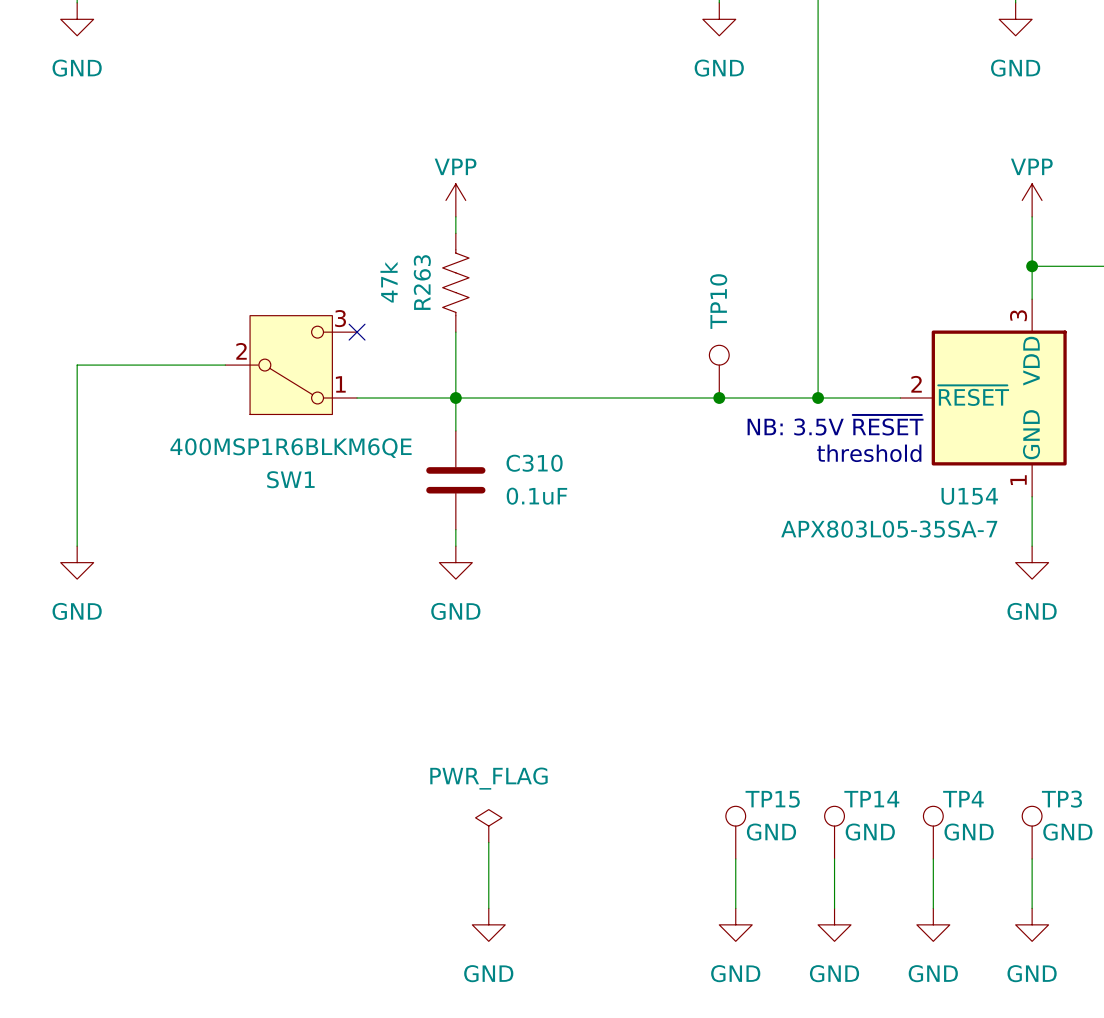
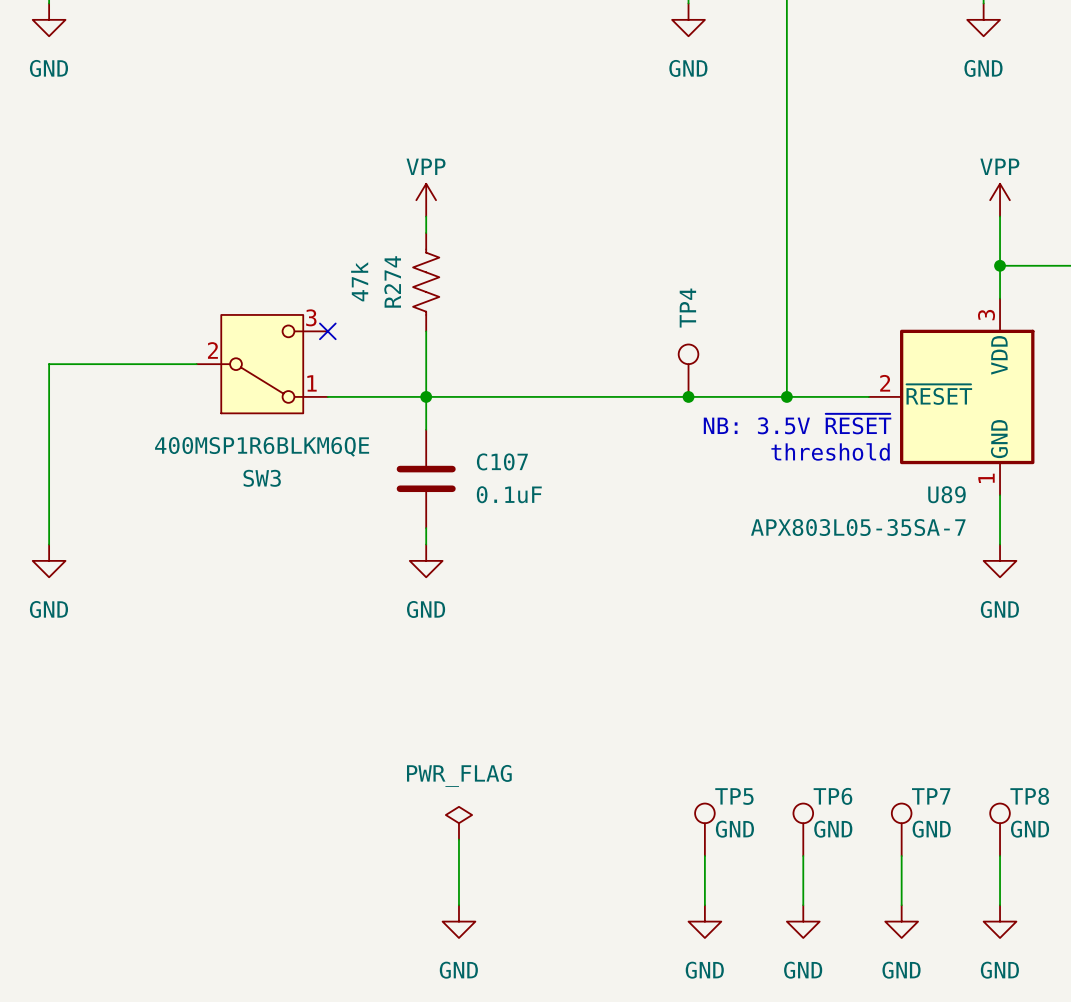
R263 name: R263 (422, 282) -> R274 (392, 281)
TP10 name: TP10 (718, 301) -> TP4 (687, 308)
C310 name: C310 (534, 463) -> C107 (502, 461)
SW1 name: SW1 (290, 479) -> SW3 (262, 478)
U154 name: U154 (969, 496) -> U89 (946, 494)
TP15 name: TP15 (772, 799) -> TP5 (734, 796)
TP14 name: TP14 (871, 799) -> TP6 (832, 796)
TP4 name: TP4 (963, 799) -> TP7 (931, 796)
TP3 name: TP3 (1061, 799) -> TP8 (1029, 796)

